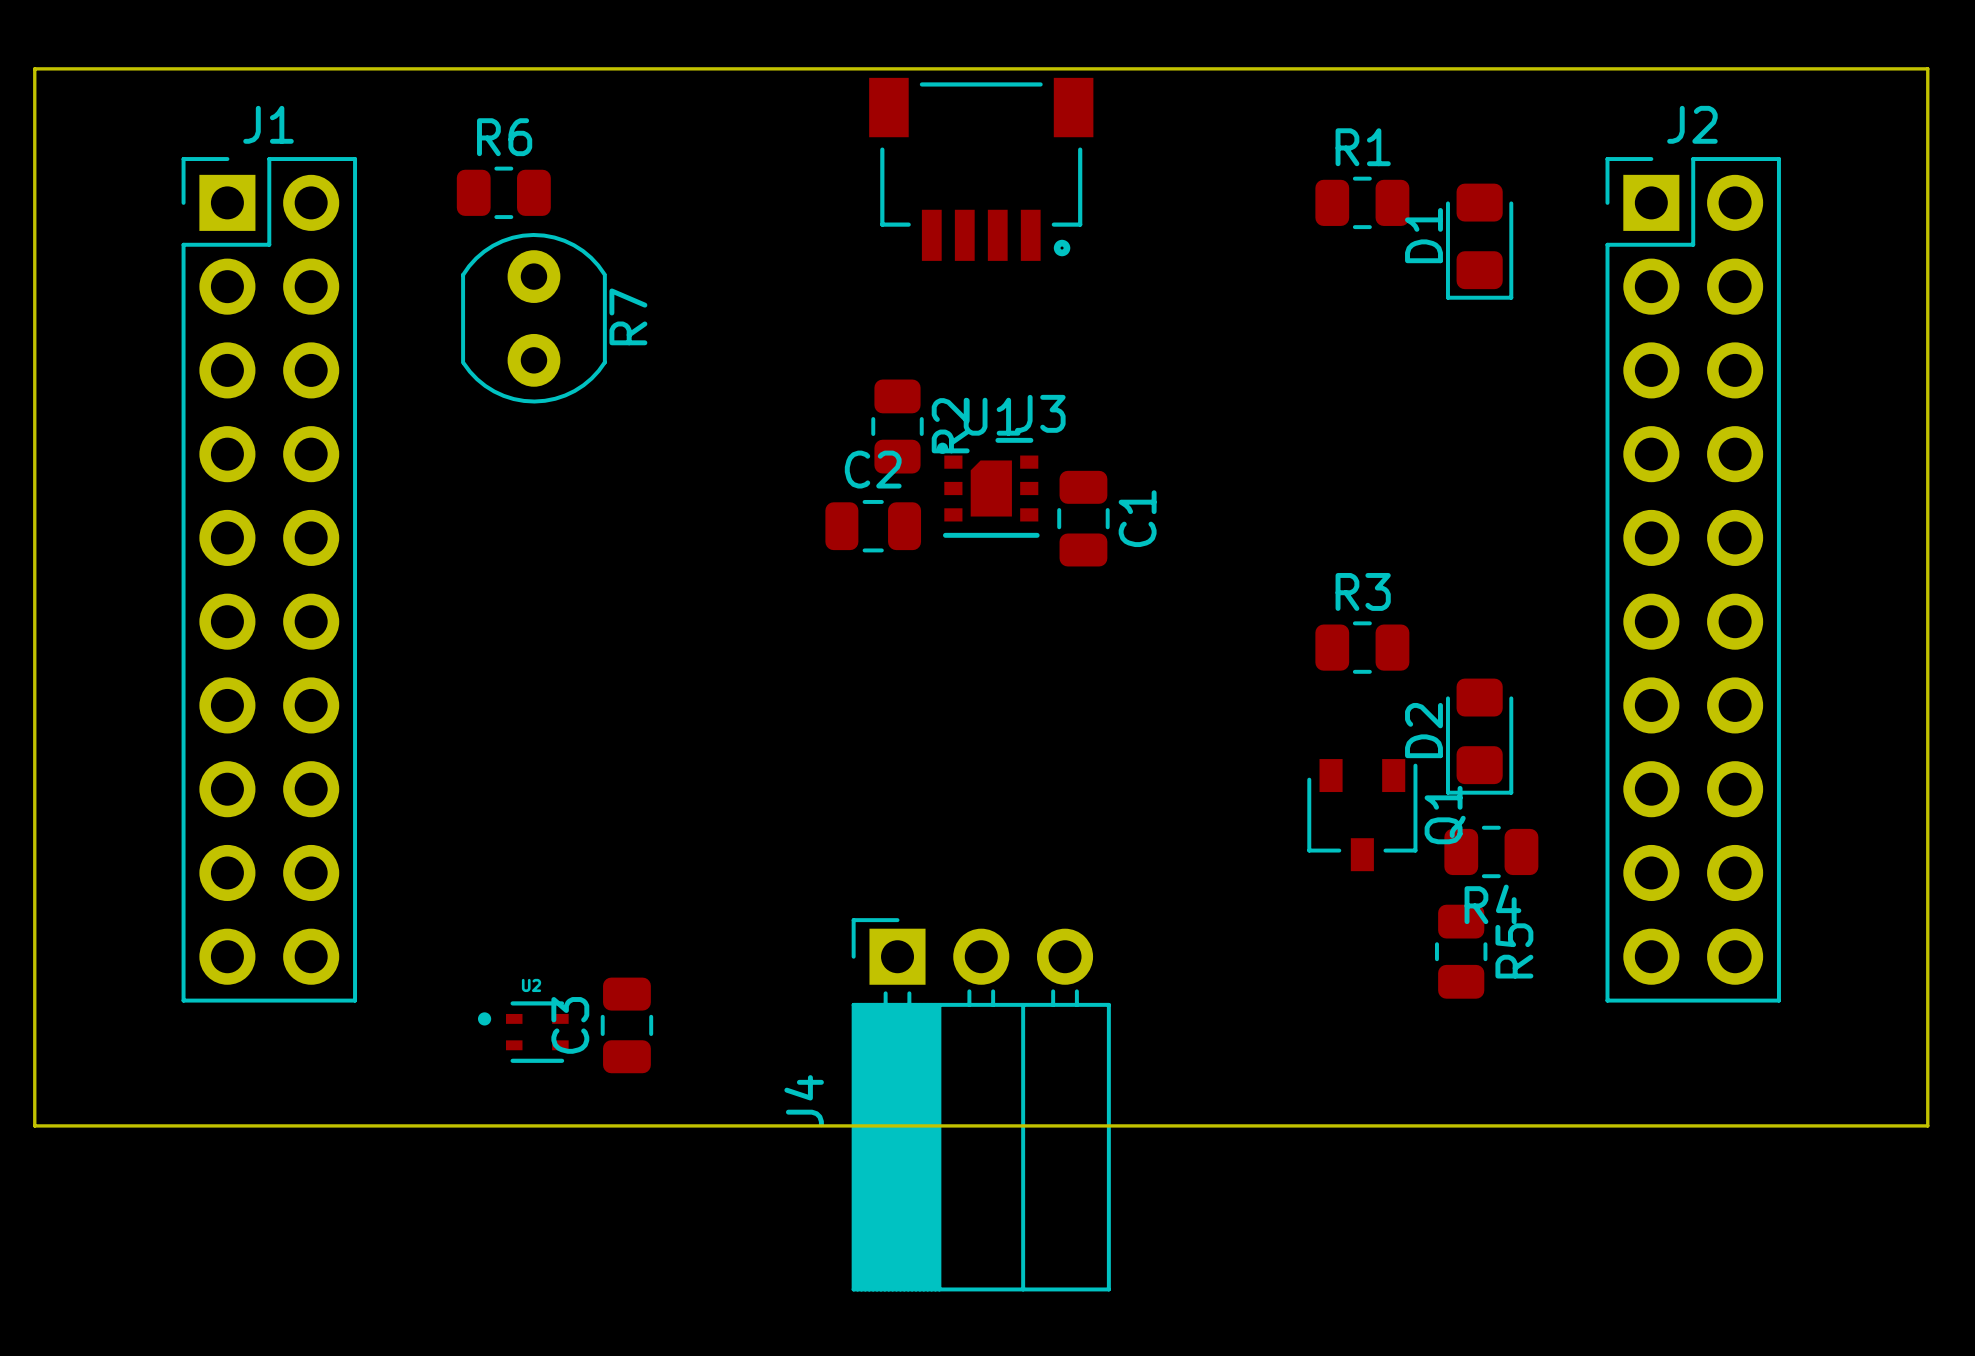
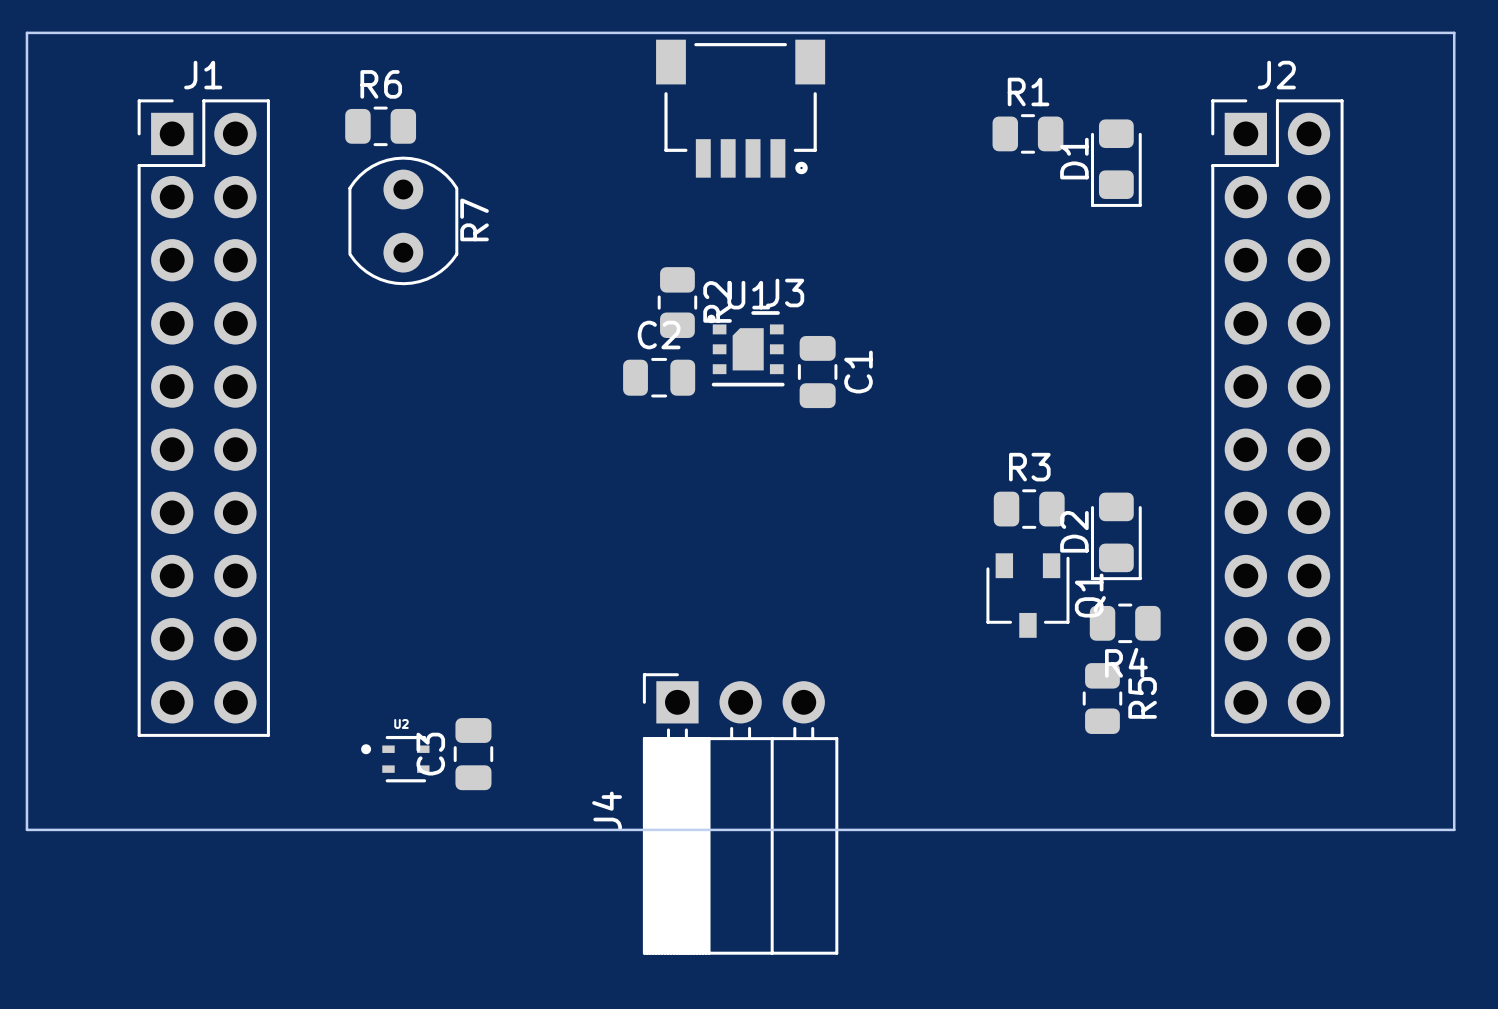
R3 position: (1362, 647) -> (1029, 509)

